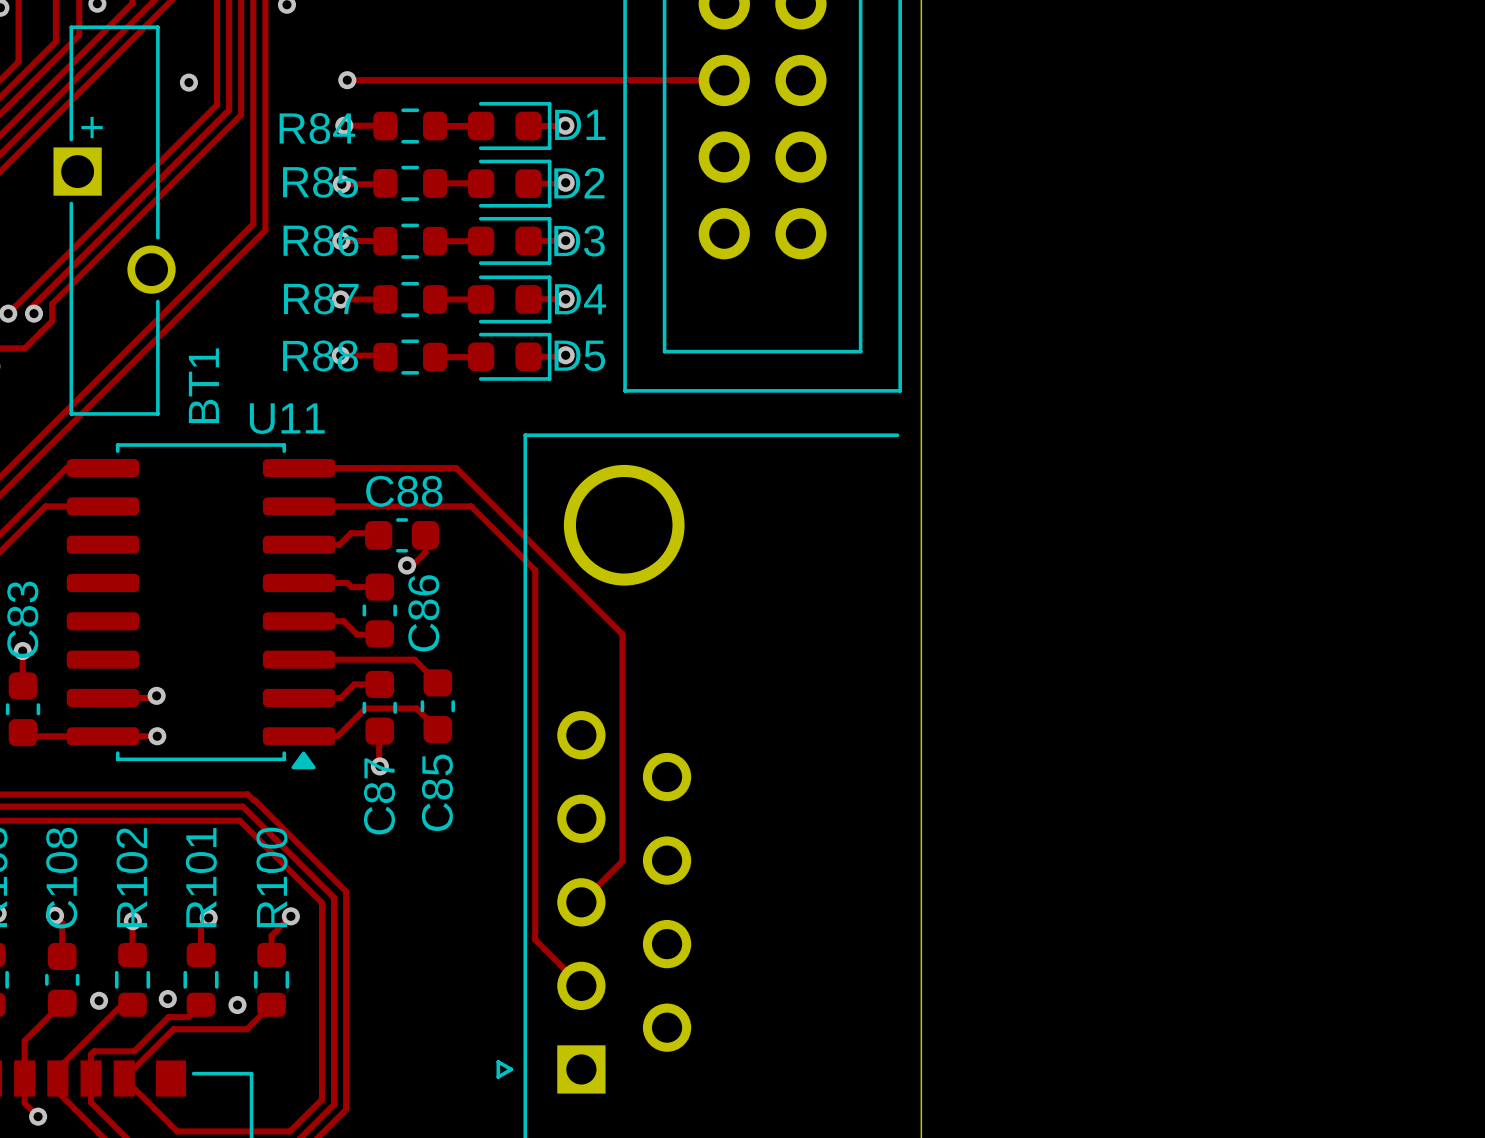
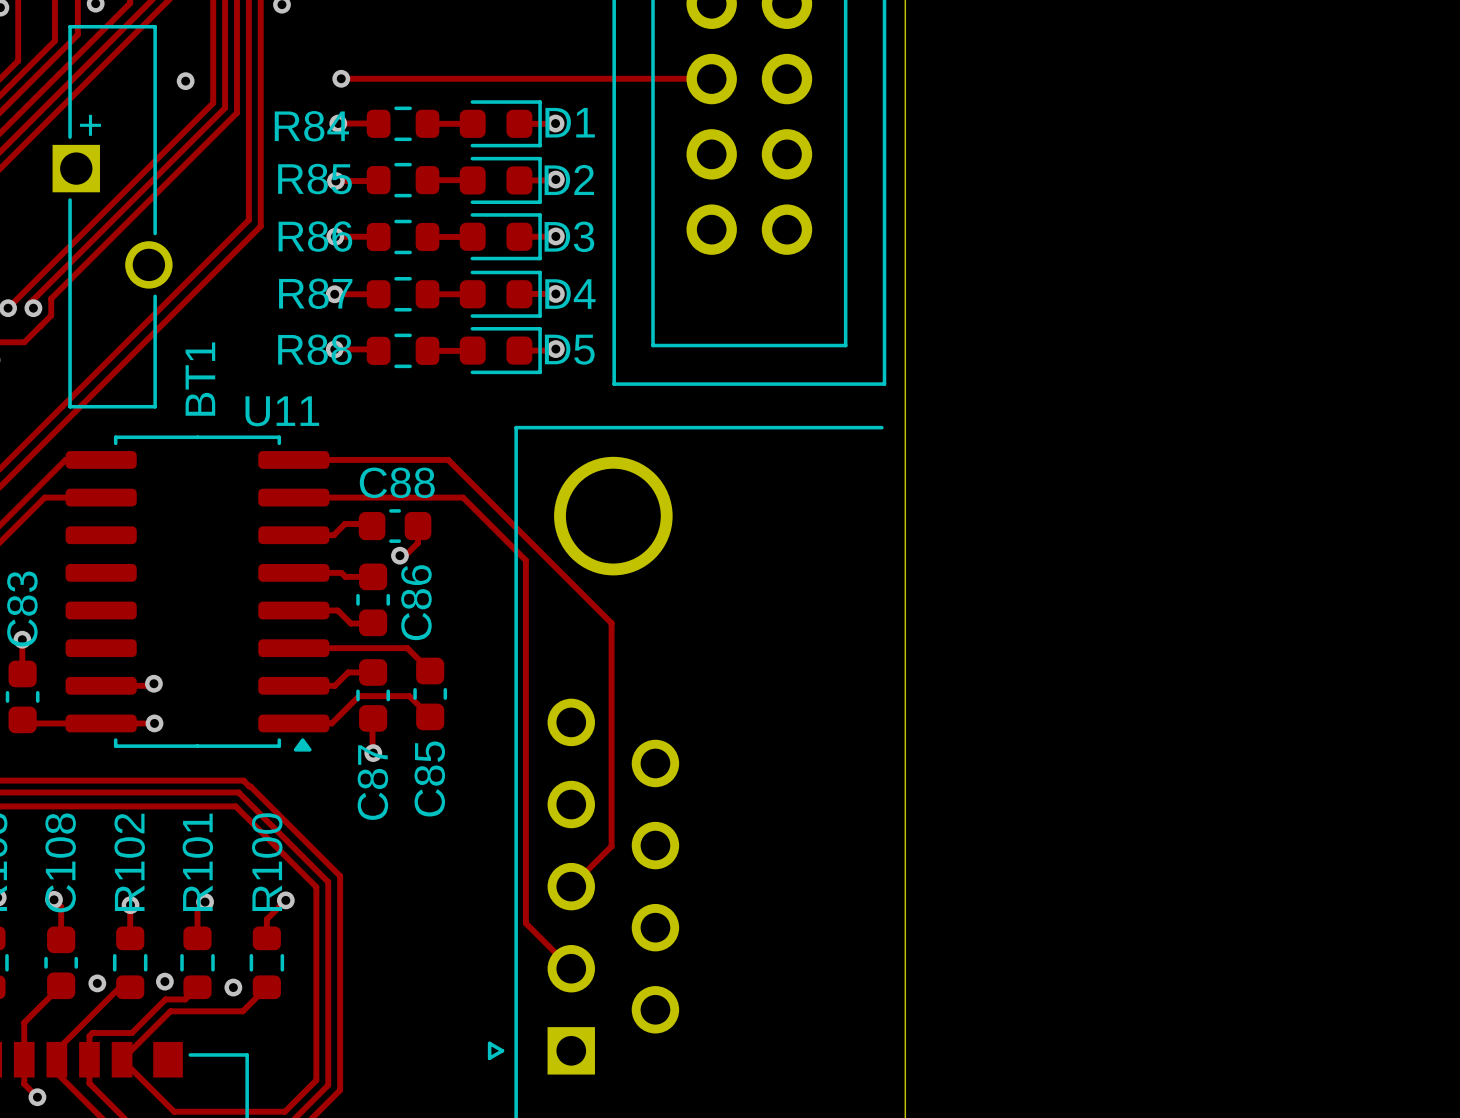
U11 footprint: [66, 443, 336, 770] -> [65, 435, 330, 752]

